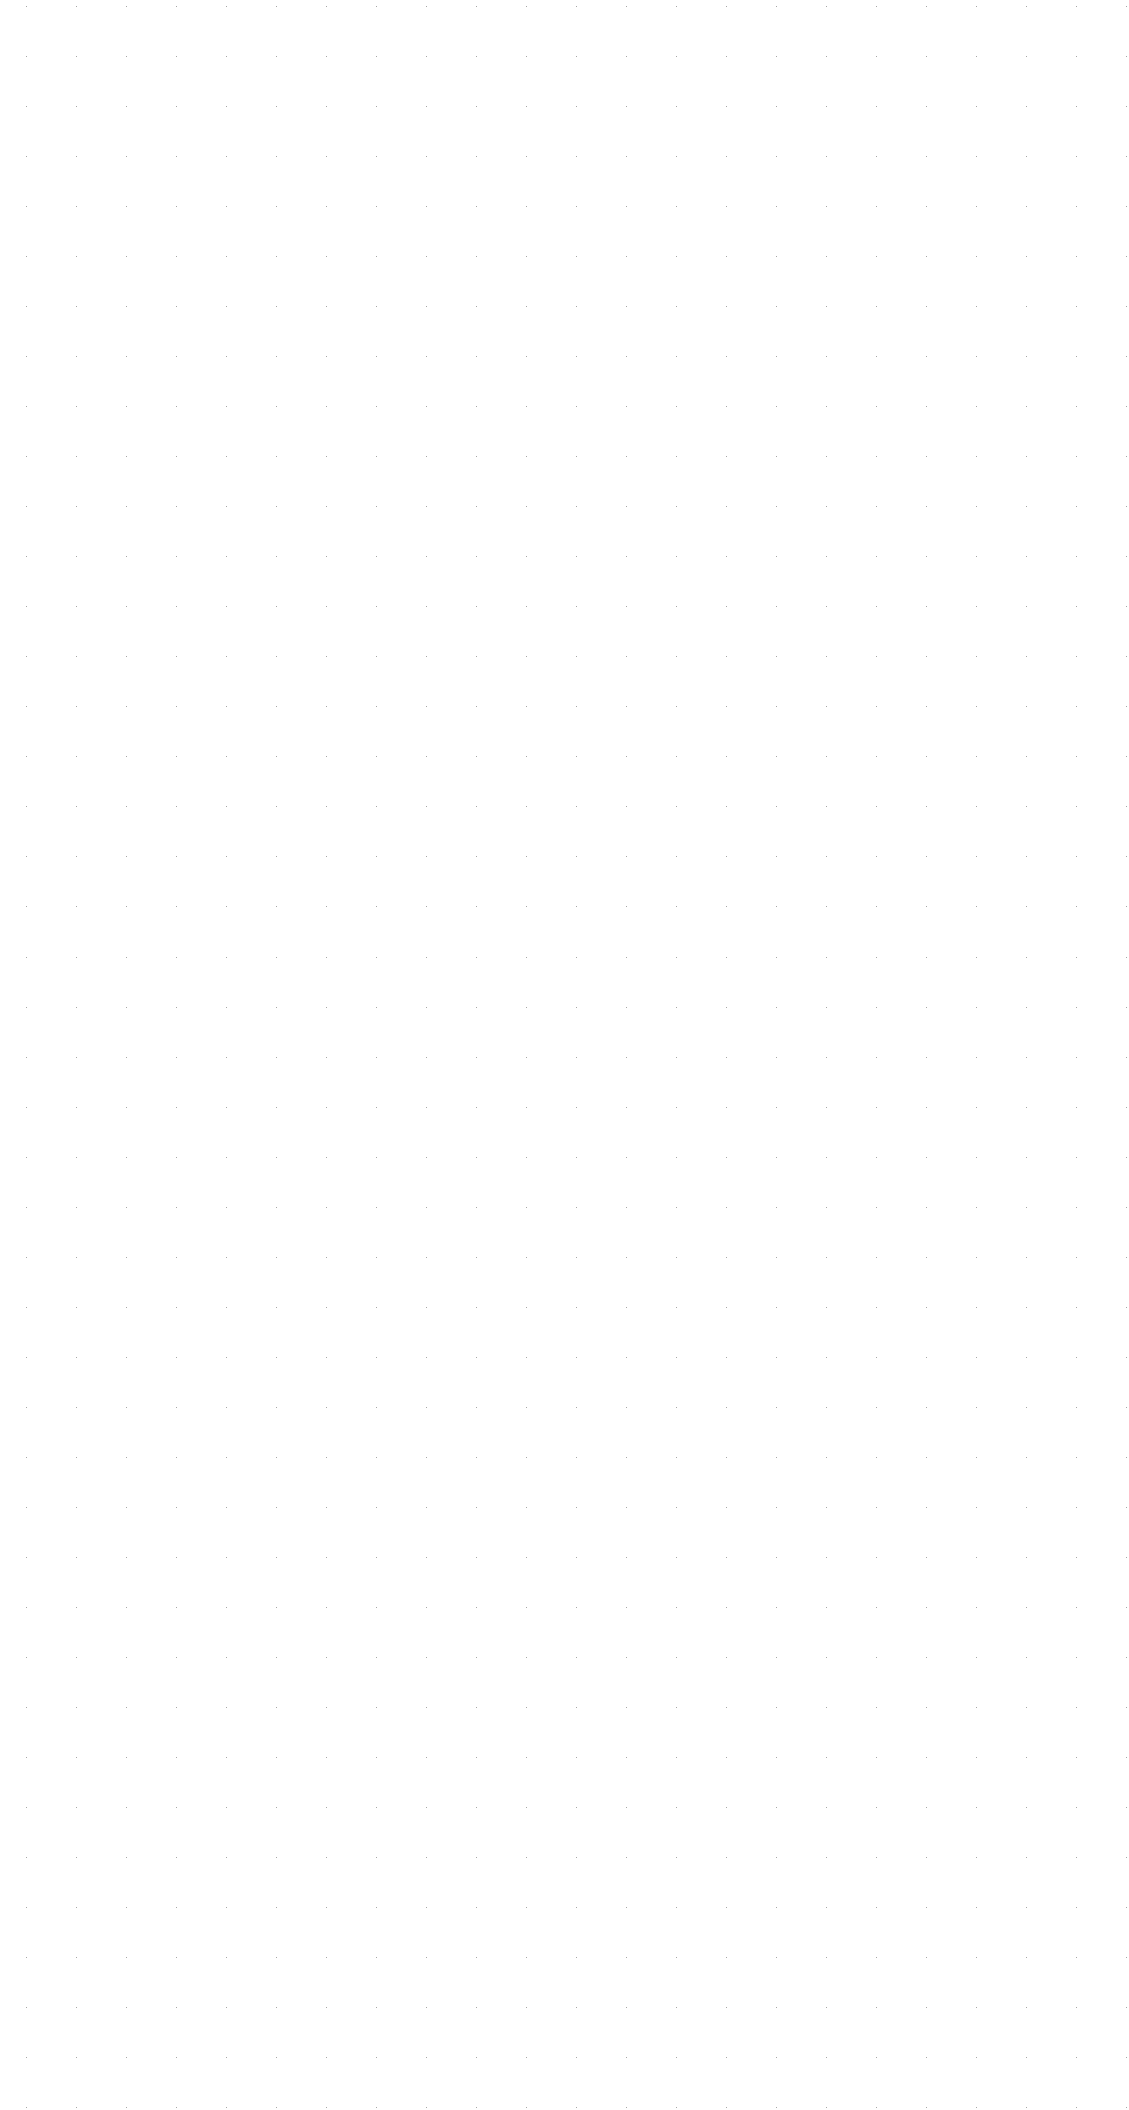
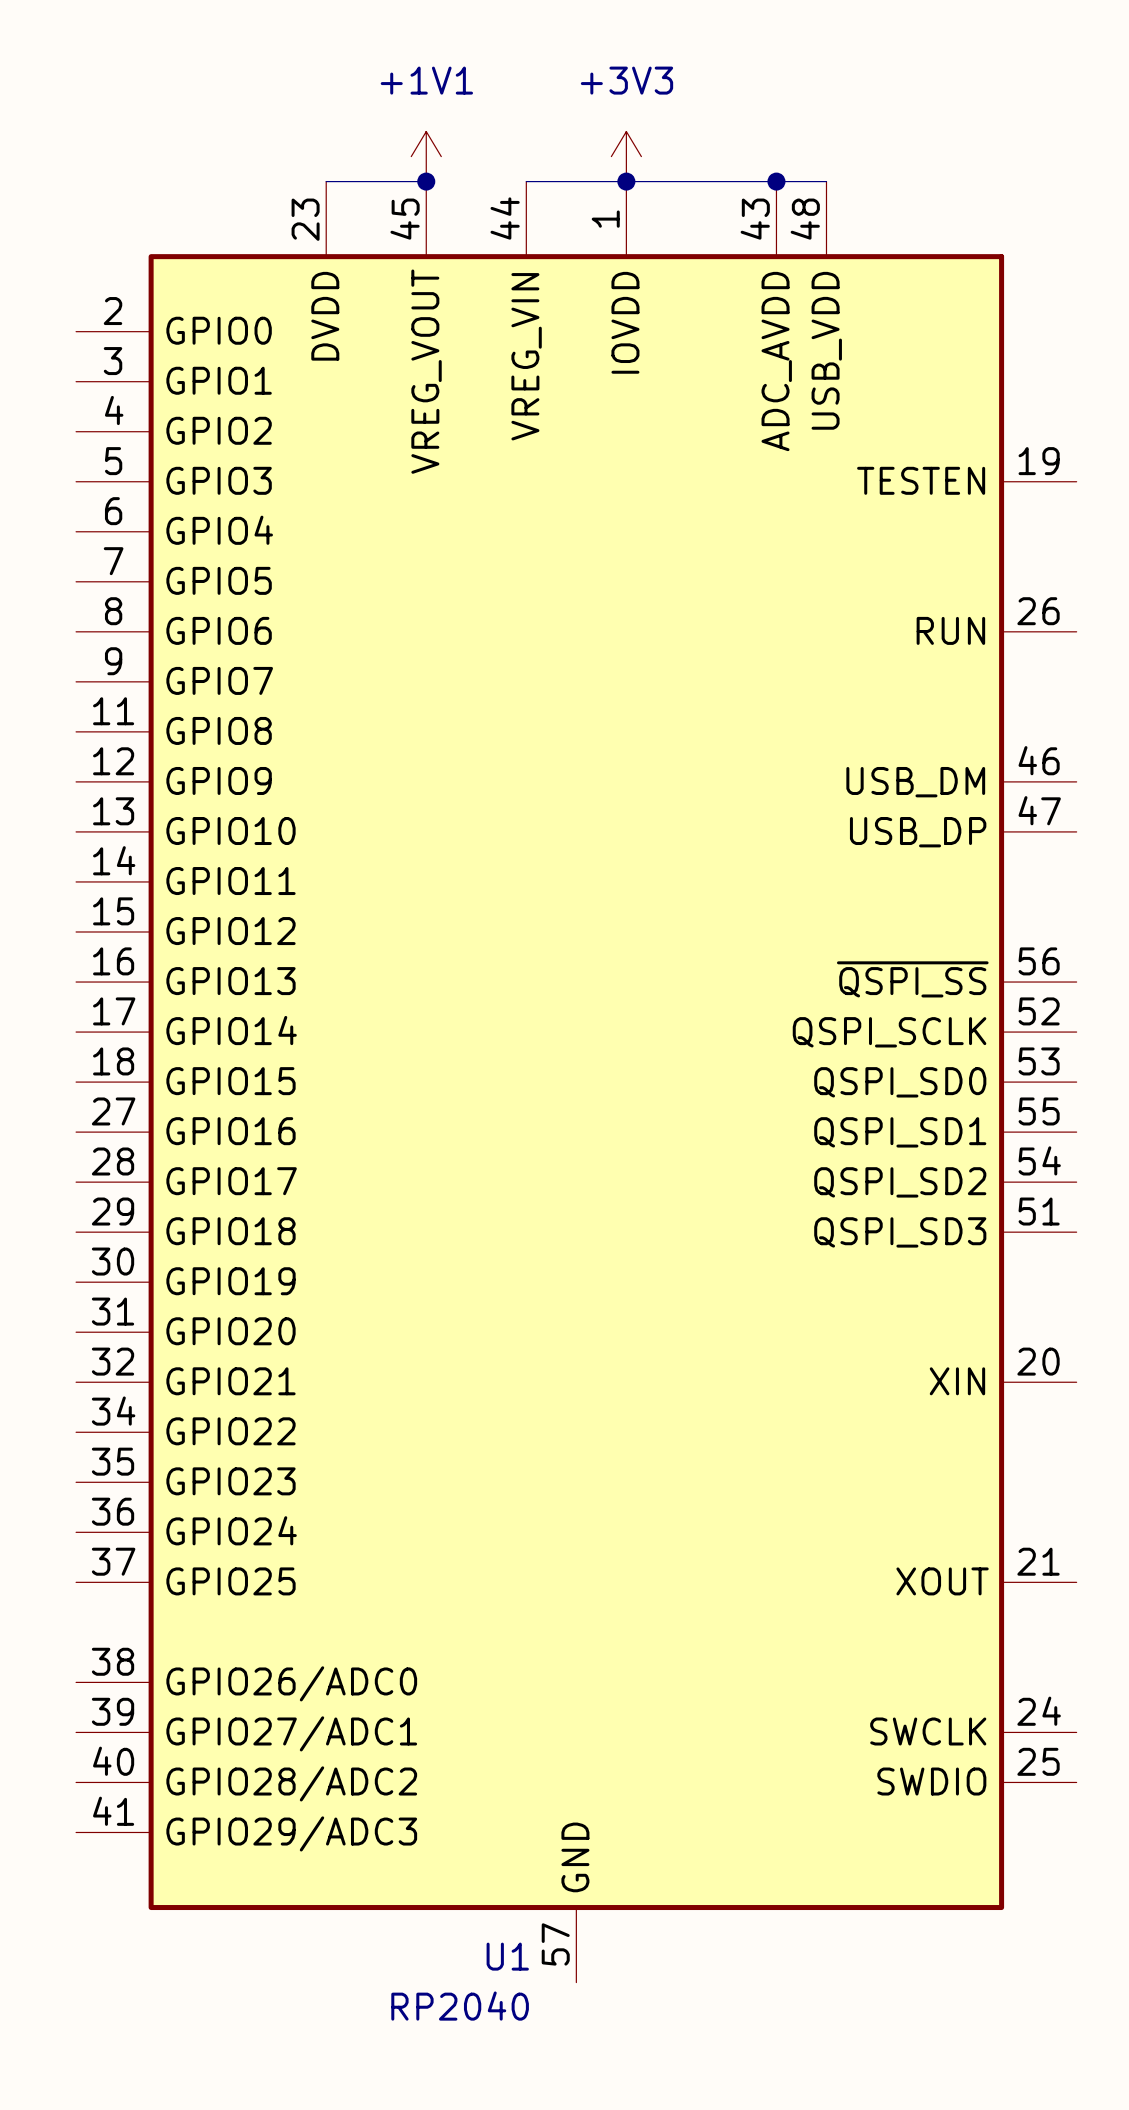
power symbol: none -> +1V1 (426, 156)
power symbol: none -> +3V3 (626, 156)
wire: none -> (326, 181) (426, 181)
junction: none -> (426, 181)
wire: none -> (526, 181) (826, 181)
junction: none -> (626, 181)
junction: none -> (776, 181)
U1: none -> RP2040 (576, 1082)

